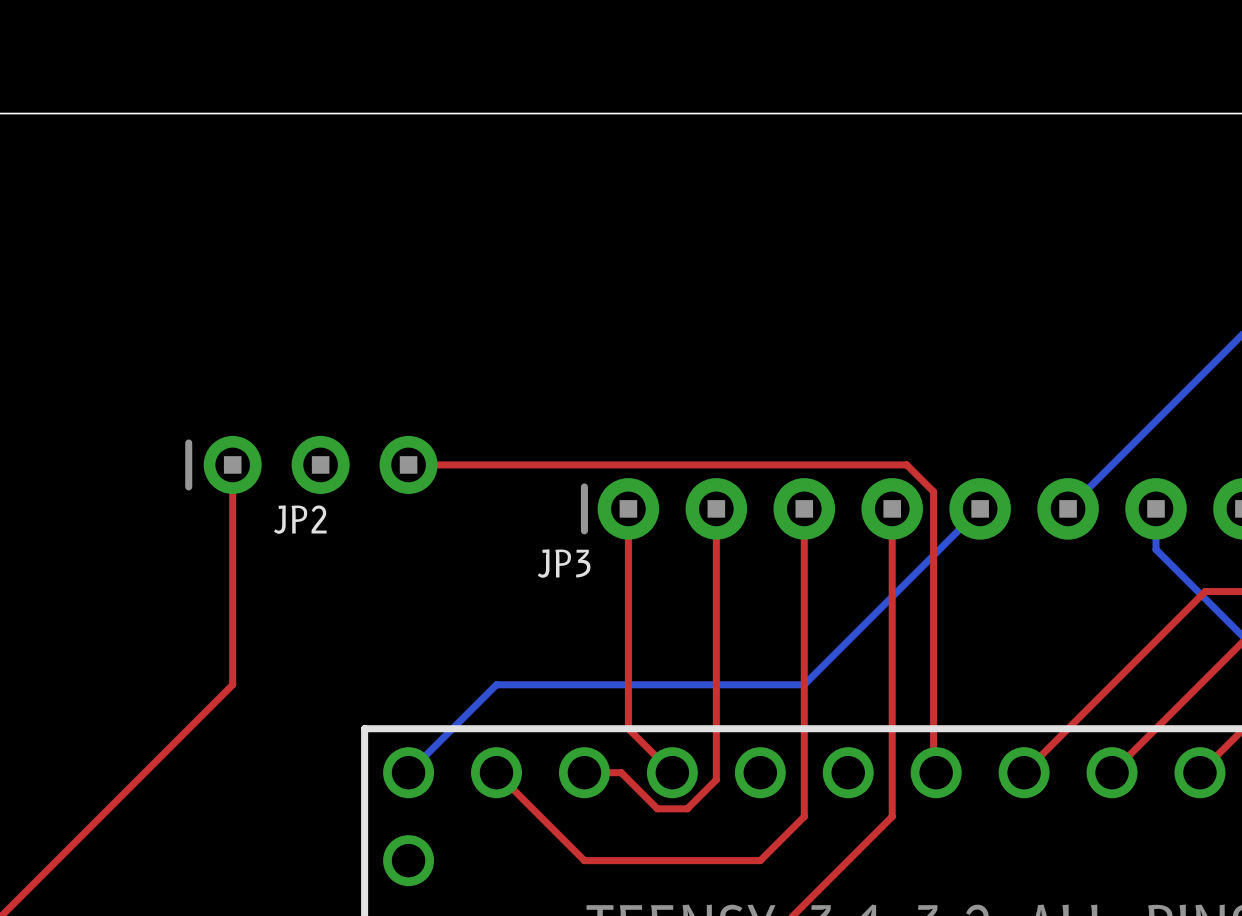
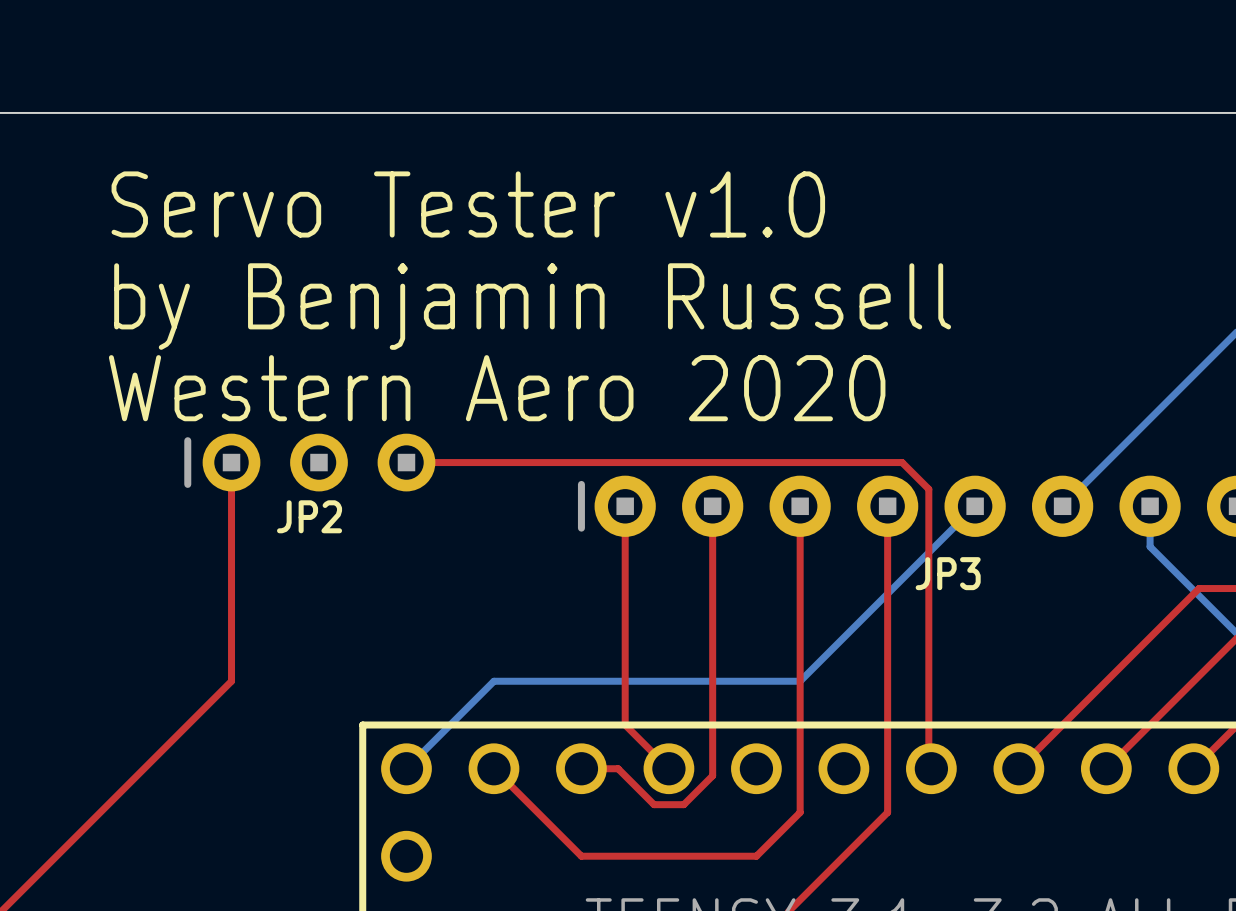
text: none -> Servo Tester v1.0 (468, 204)
text: none -> by Benjamin Russell (532, 306)
text: none -> Western Aero 2020 (497, 388)
JP3 name position: JP3 (564, 563) -> JP3 (948, 573)

